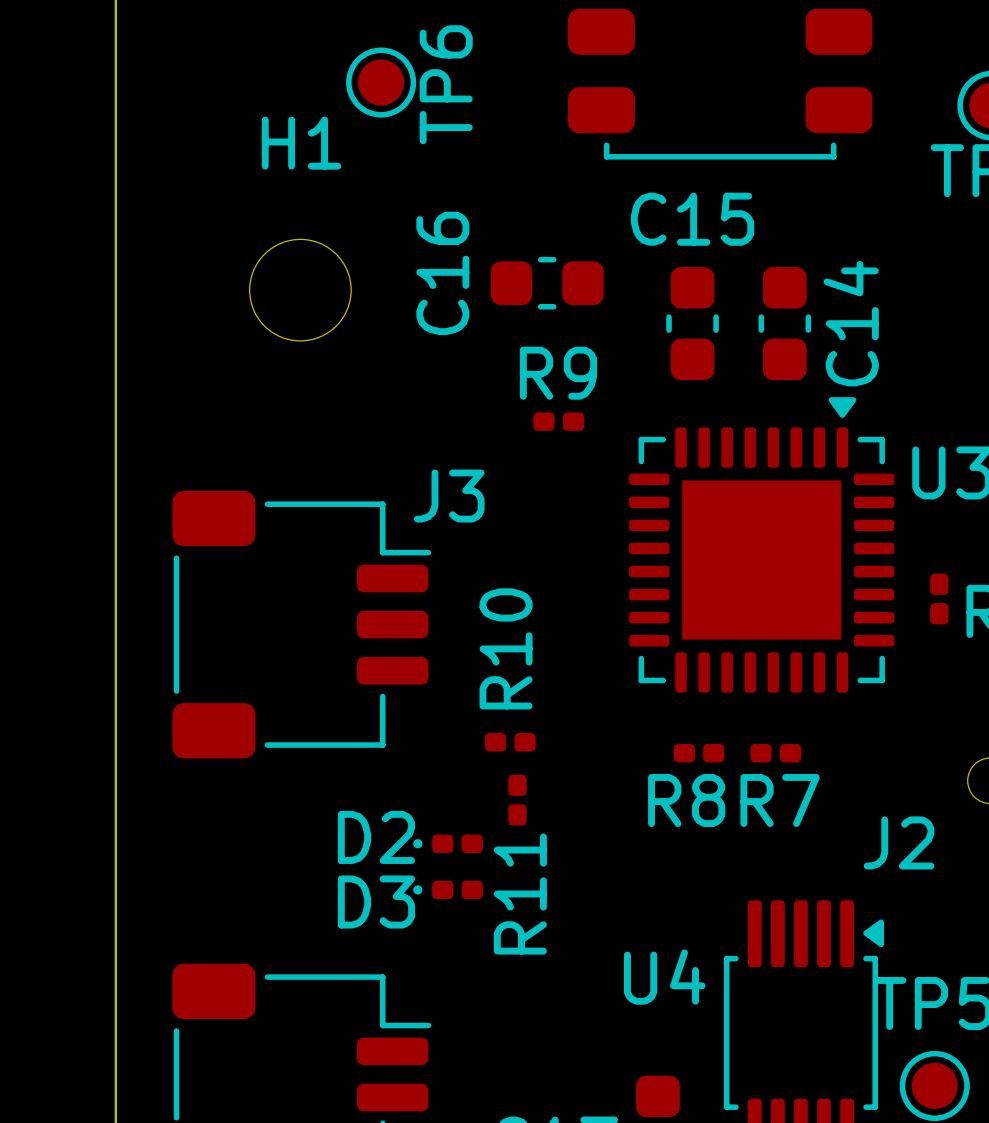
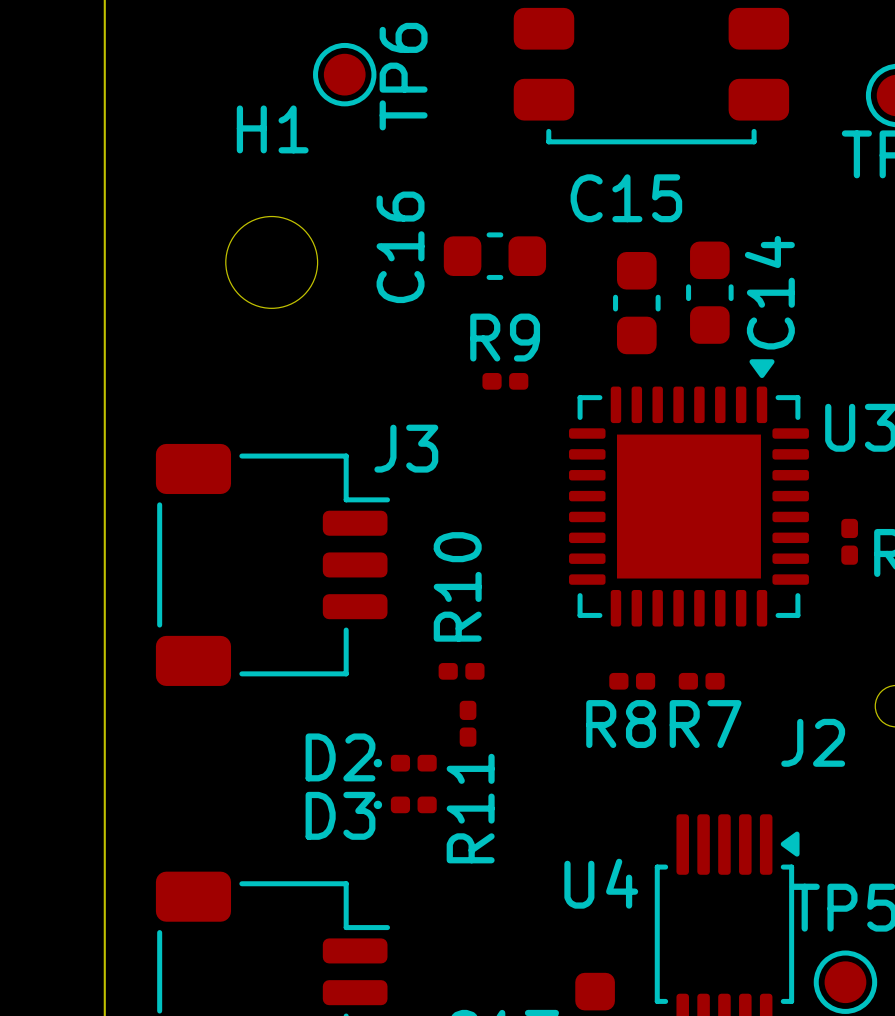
C15 position: (692, 323) -> (636, 303)
J2 name position: J2 (899, 842) -> J2 (813, 742)

